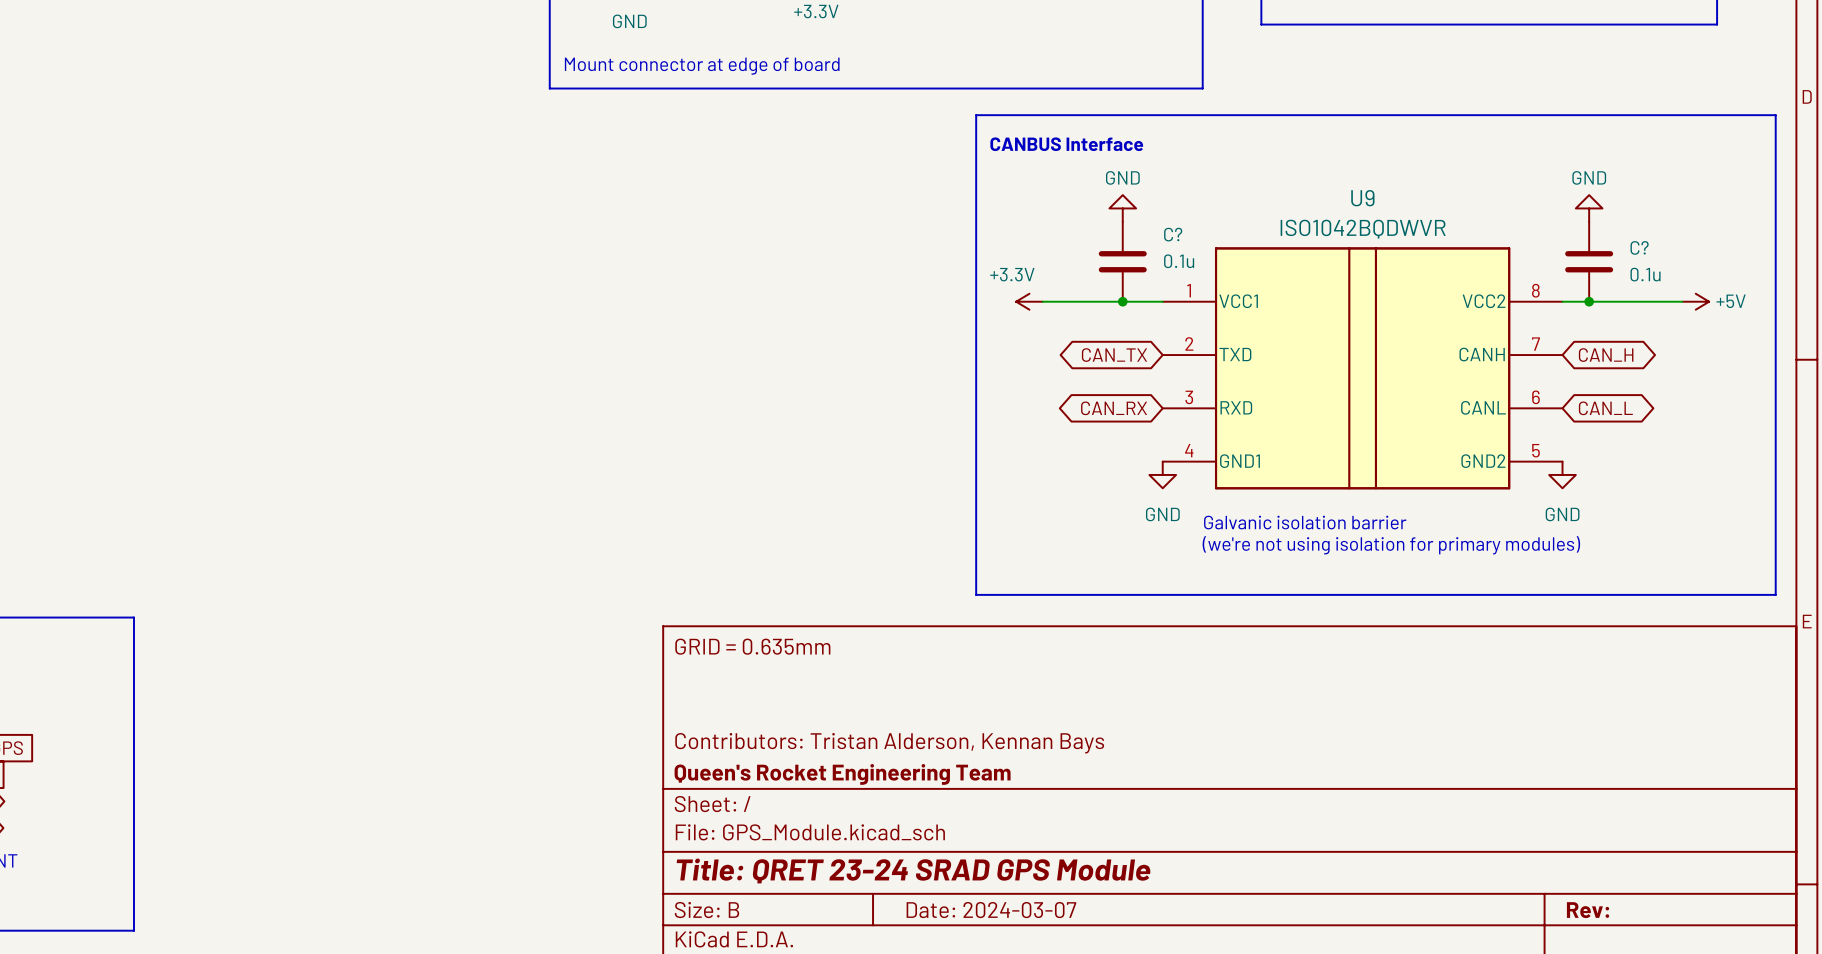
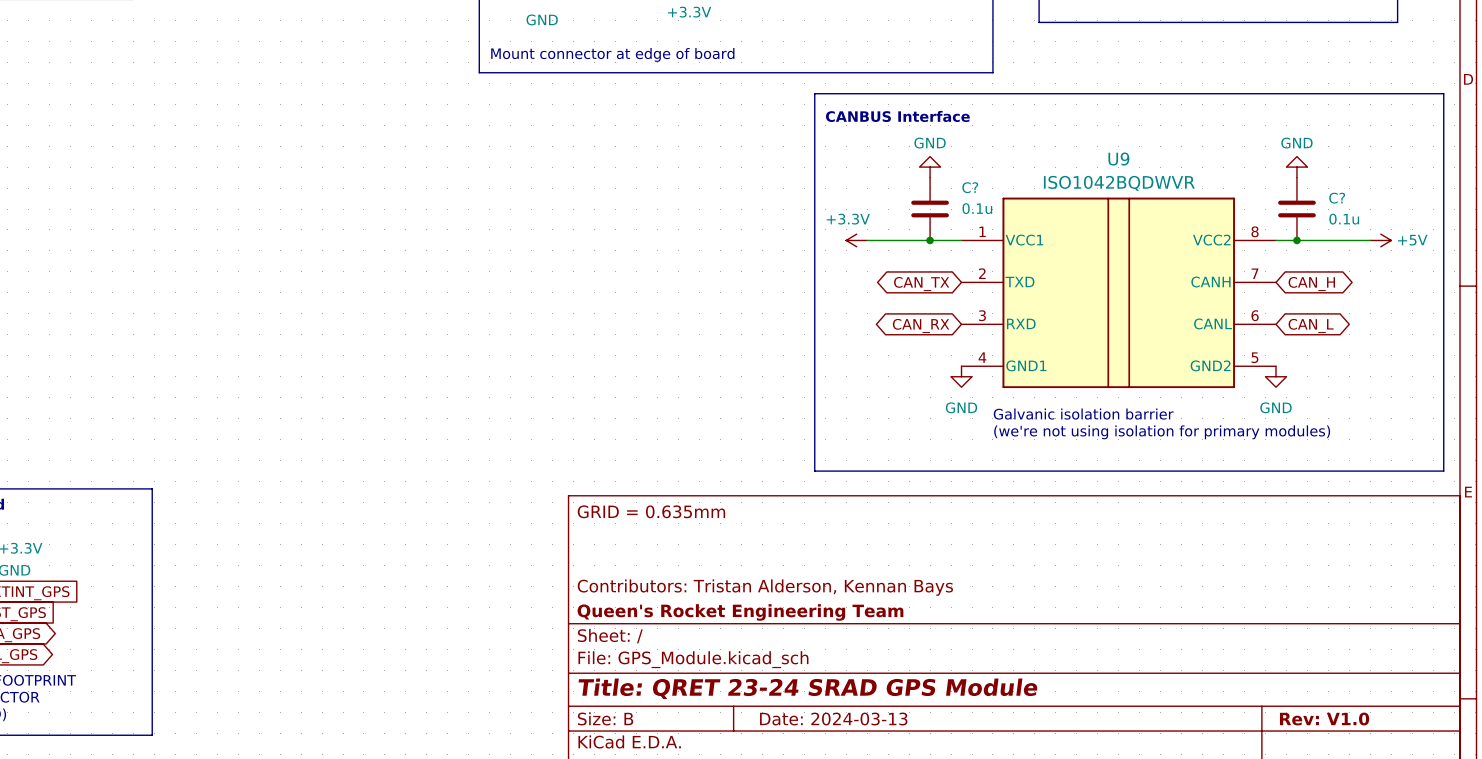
title block: Date: 2024-03-07 (991, 910) -> Date: 2024-03-13 (833, 719)
title block: Rev: (1588, 910) -> Rev: V1.0 (1324, 719)

